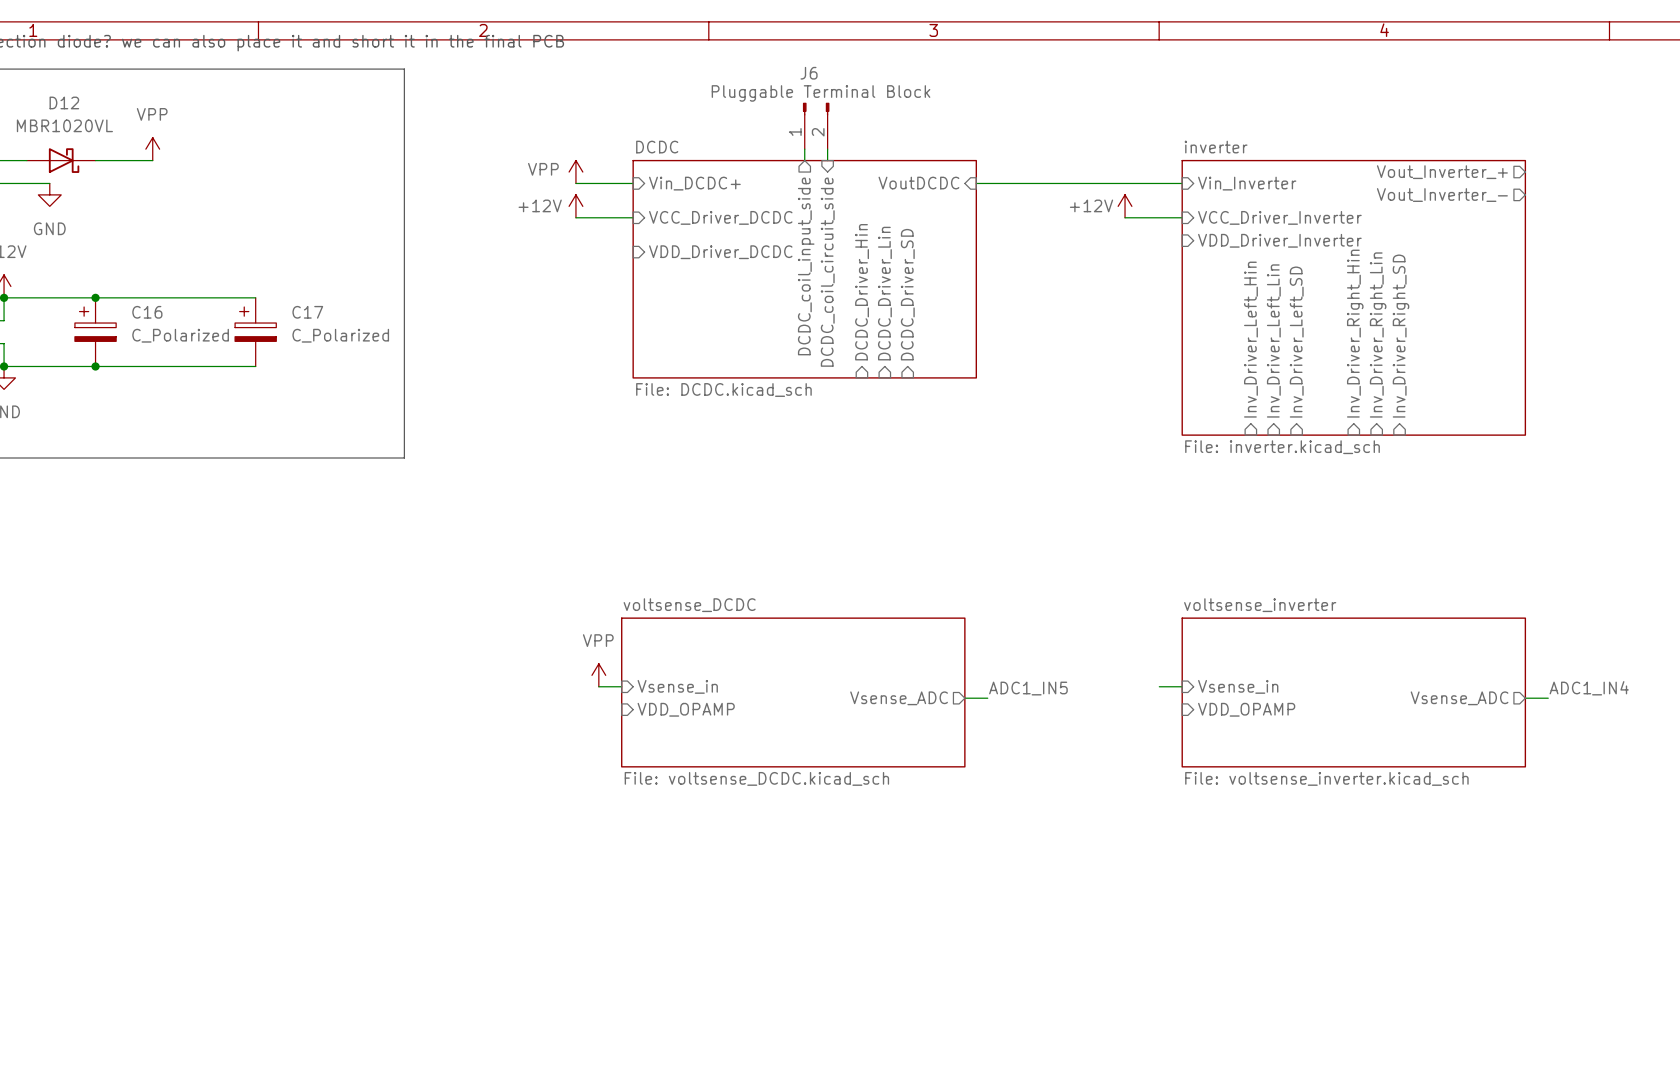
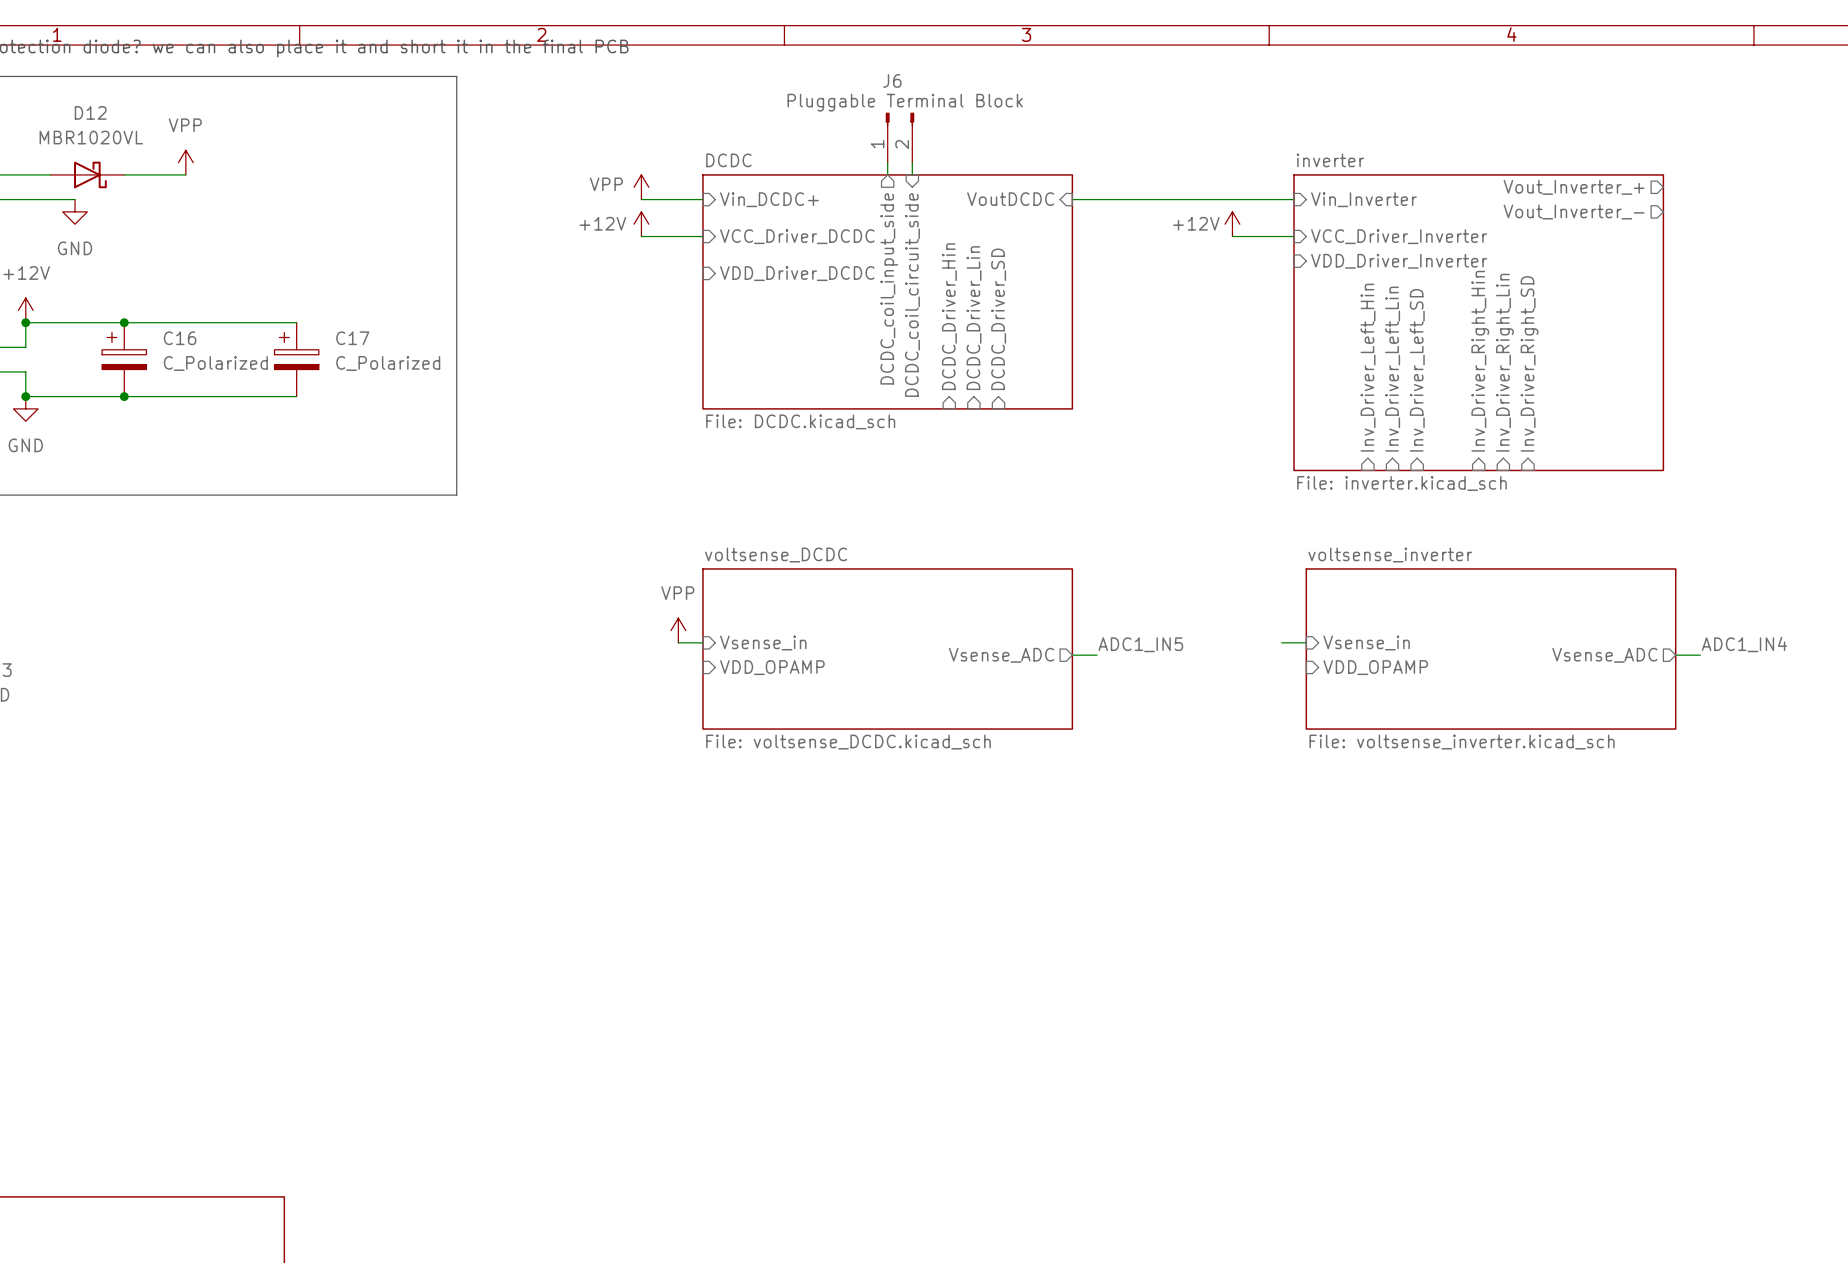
power symbol position: VPP (598, 675) -> VPP (678, 630)
wire: (598, 686) (621, 686) -> (678, 642) (702, 642)
sheet pin position: Vsense_in (677, 686) -> Vsense_in (763, 642)
wire: (1159, 686) (1182, 686) -> (1281, 642) (1306, 642)
sheet pin position: Vsense_in (1238, 686) -> Vsense_in (1366, 642)
label position: ADC1_IN5 (1028, 688) -> ADC1_IN5 (1140, 644)
label position: ADC1_IN4 (1589, 688) -> ADC1_IN4 (1744, 644)
sheet voltsense_DCDC position: (793, 692) -> (887, 649)
sheet voltsense_inverter position: (1353, 692) -> (1491, 649)
sheet pin position: Vsense_ADC (899, 698) -> Vsense_ADC (1001, 655)
wire: (964, 698) (987, 698) -> (1072, 655) (1097, 655)
sheet pin position: Vsense_ADC (1459, 698) -> Vsense_ADC (1604, 655)
wire: (1525, 698) (1548, 698) -> (1675, 655) (1700, 655)
sheet pin position: VDD_OPAMP (686, 709) -> VDD_OPAMP (772, 667)
sheet pin position: VDD_OPAMP (1246, 709) -> VDD_OPAMP (1375, 667)

